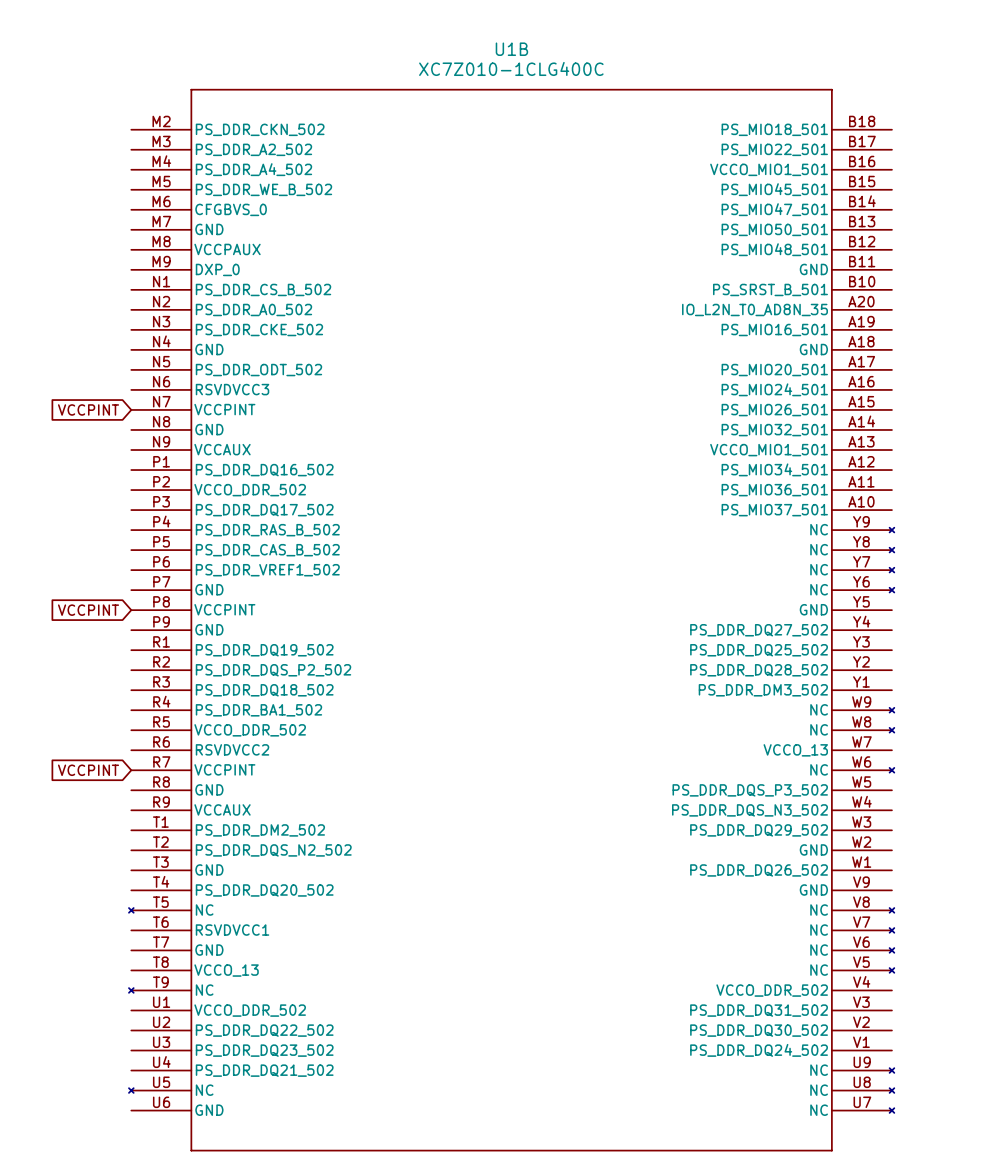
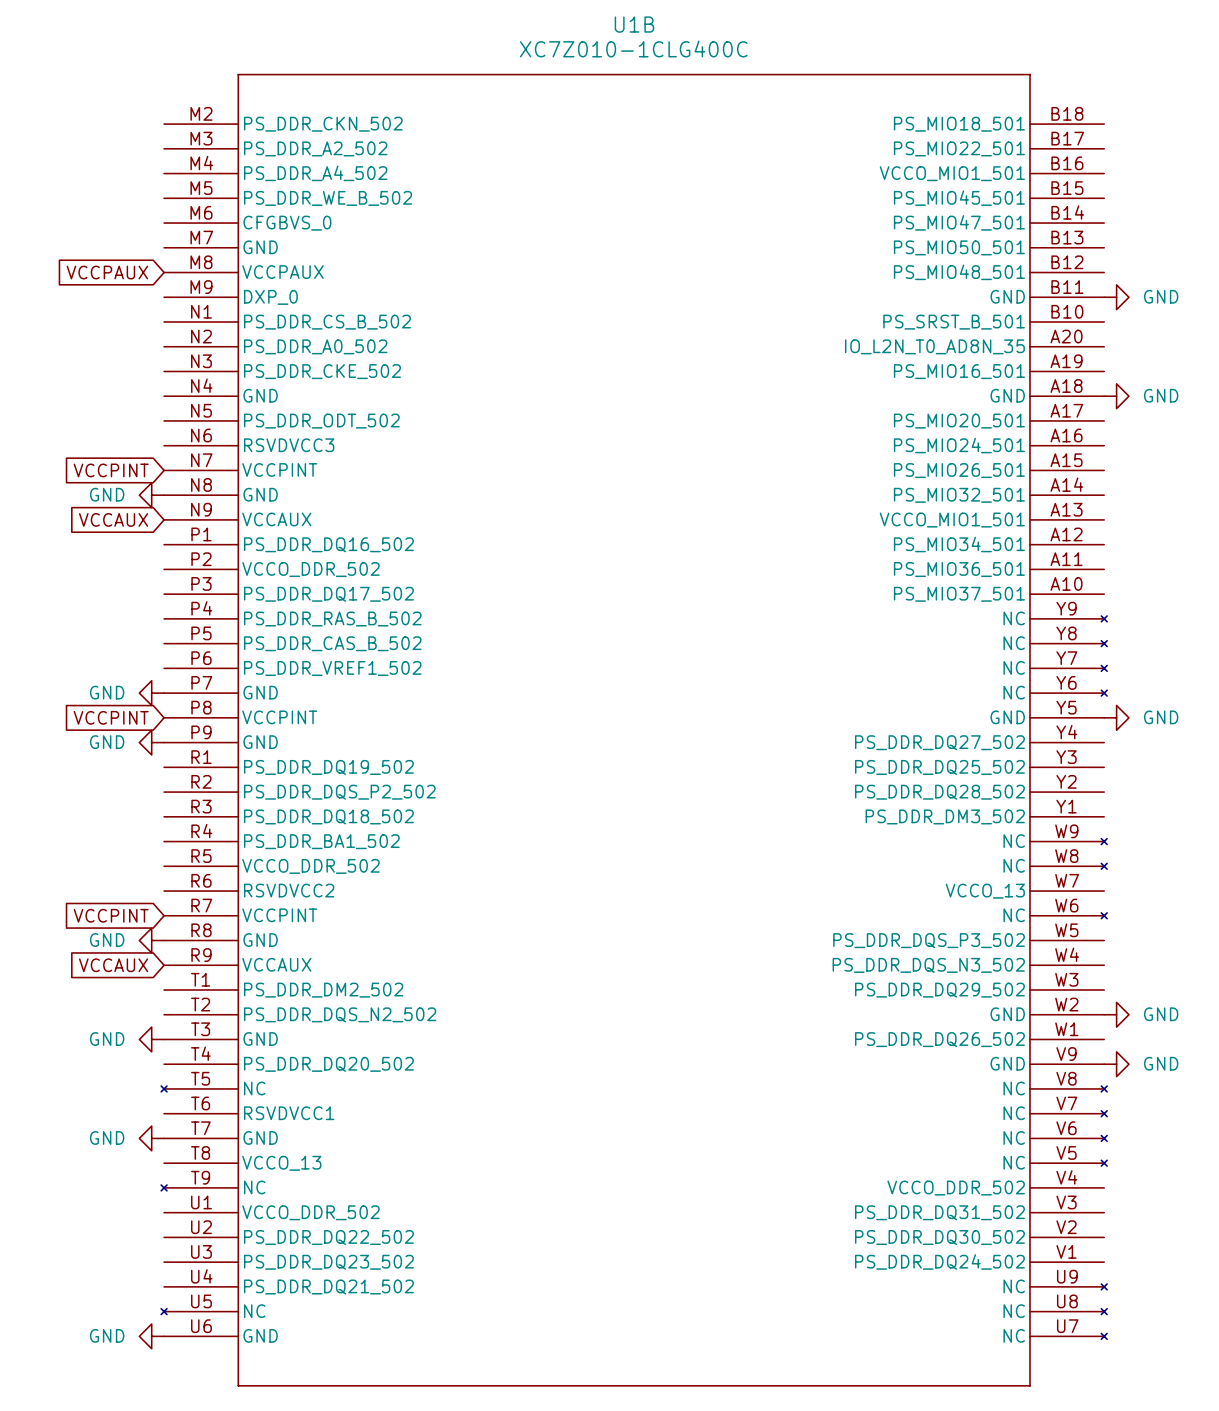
global label: none -> VCCPAUX (107, 272)
power symbol: none -> GND (1116, 297)
power symbol: none -> GND (1116, 396)
power symbol: none -> GND (151, 495)
global label: none -> VCCAUX (113, 519)
power symbol: none -> GND (151, 693)
power symbol: none -> GND (1116, 717)
power symbol: none -> GND (151, 742)
power symbol: none -> GND (151, 940)
global label: none -> VCCAUX (113, 965)
power symbol: none -> GND (1116, 1014)
power symbol: none -> GND (151, 1039)
power symbol: none -> GND (1116, 1064)
power symbol: none -> GND (151, 1138)
power symbol: none -> GND (151, 1336)

